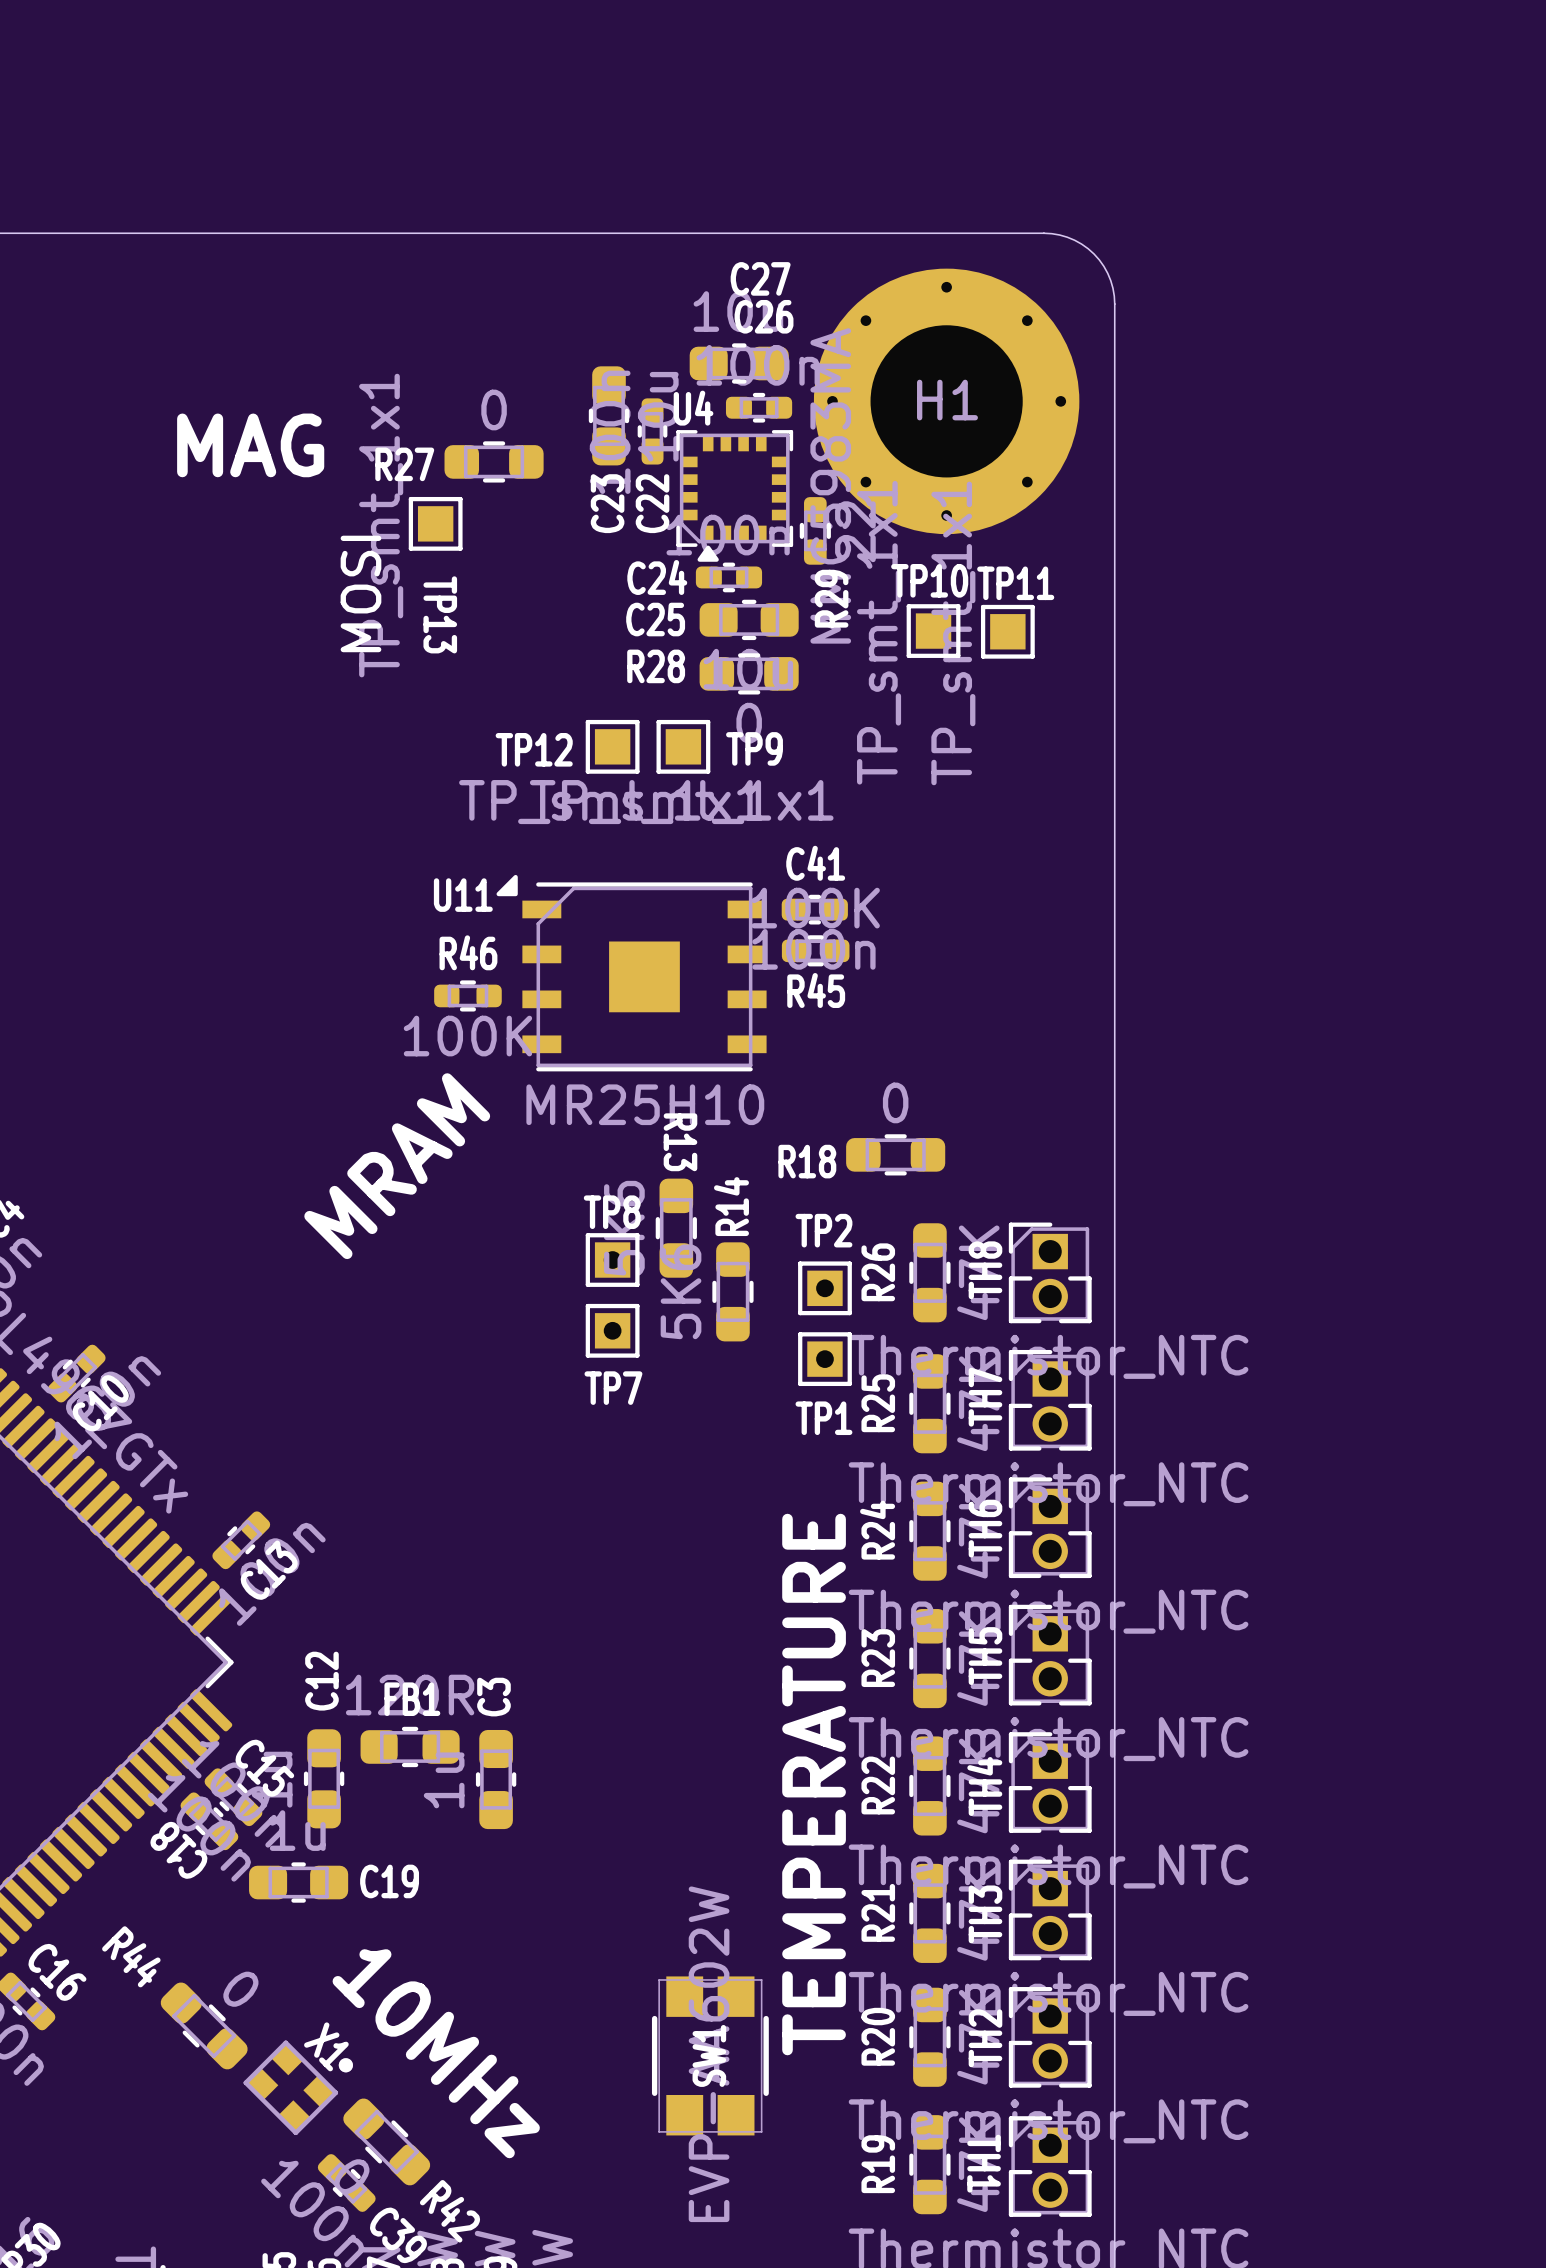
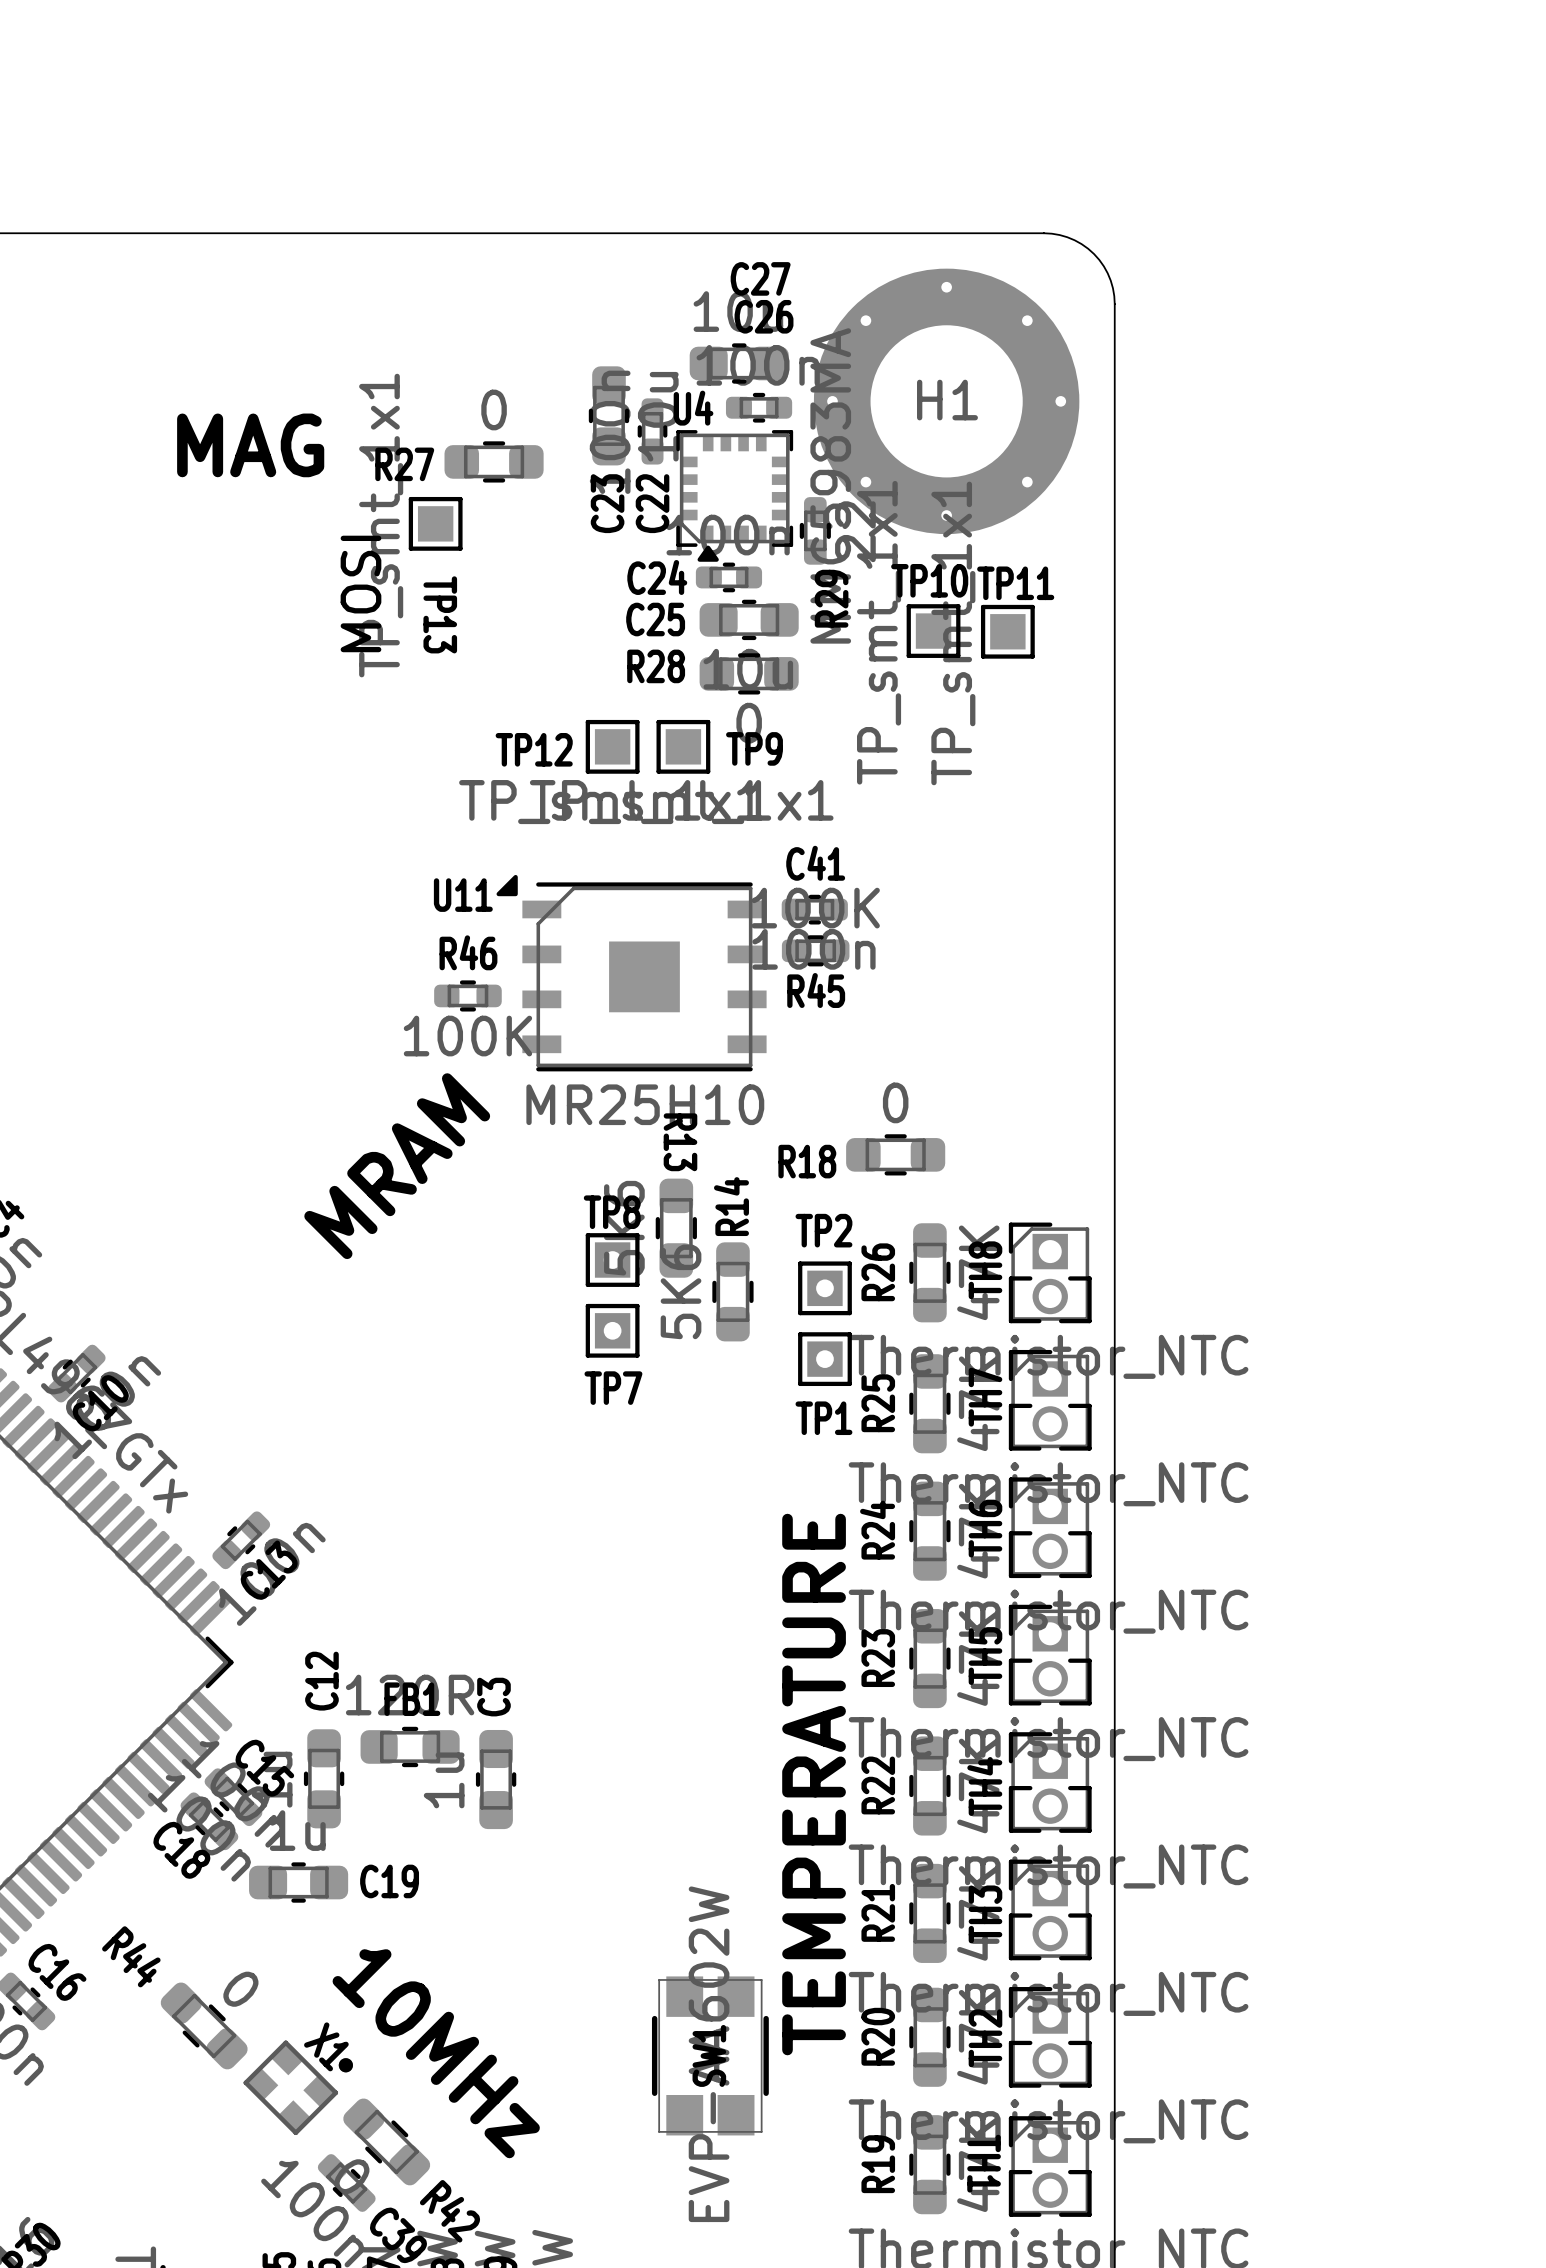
C18 name rotation: 0° (178, 1850) -> 180° (181, 1850)

